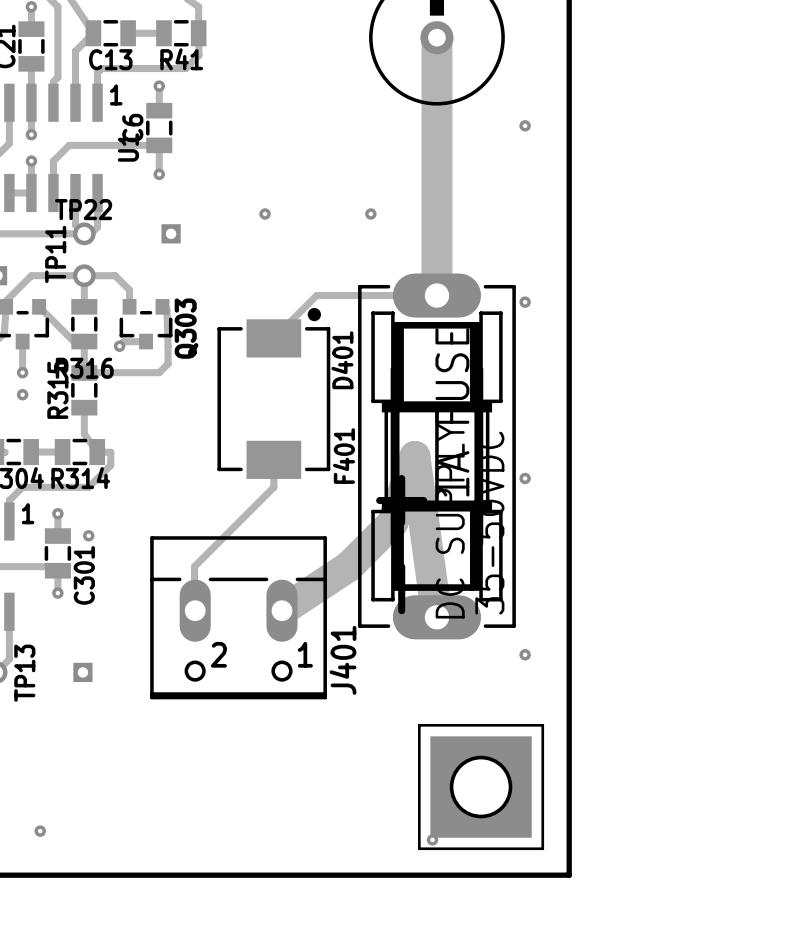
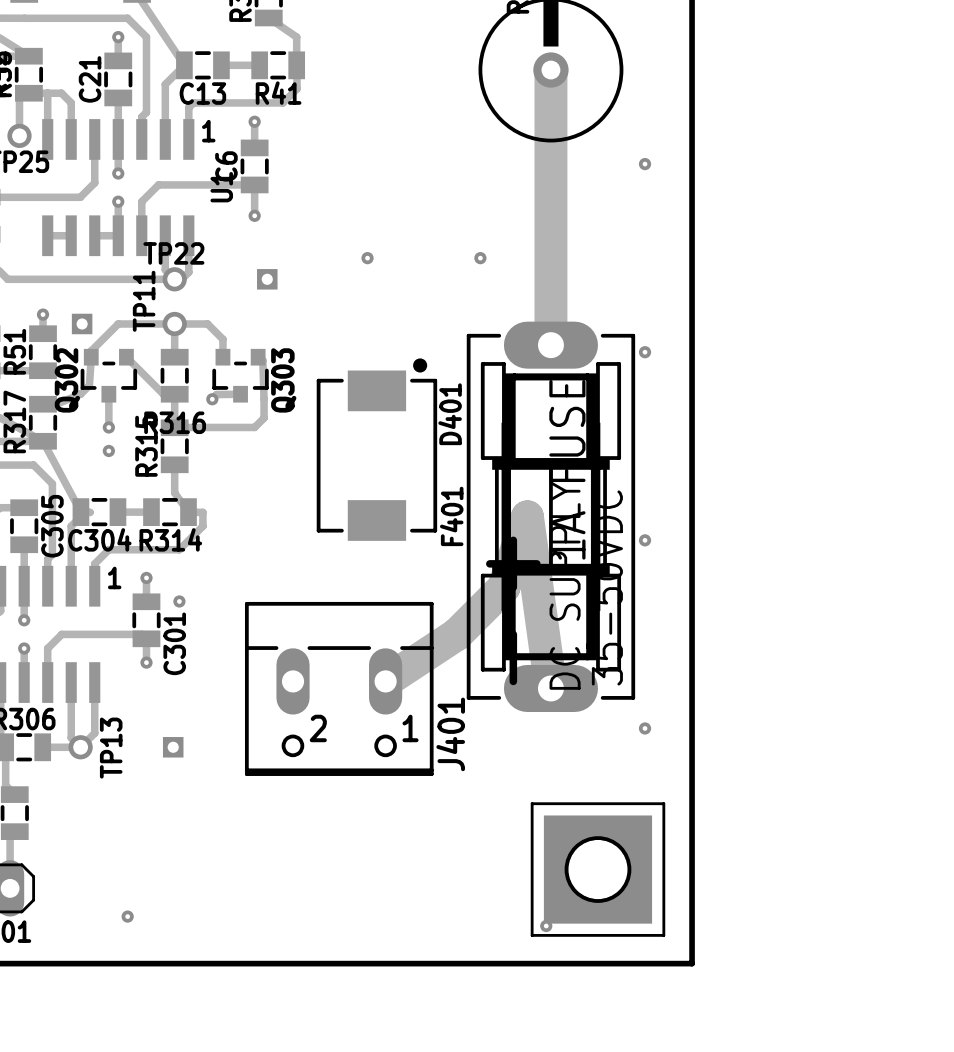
track: (436, 295) (316, 295) (273, 338) -> none
track: (273, 459) (273, 487) (194, 566) (195, 610) -> none

